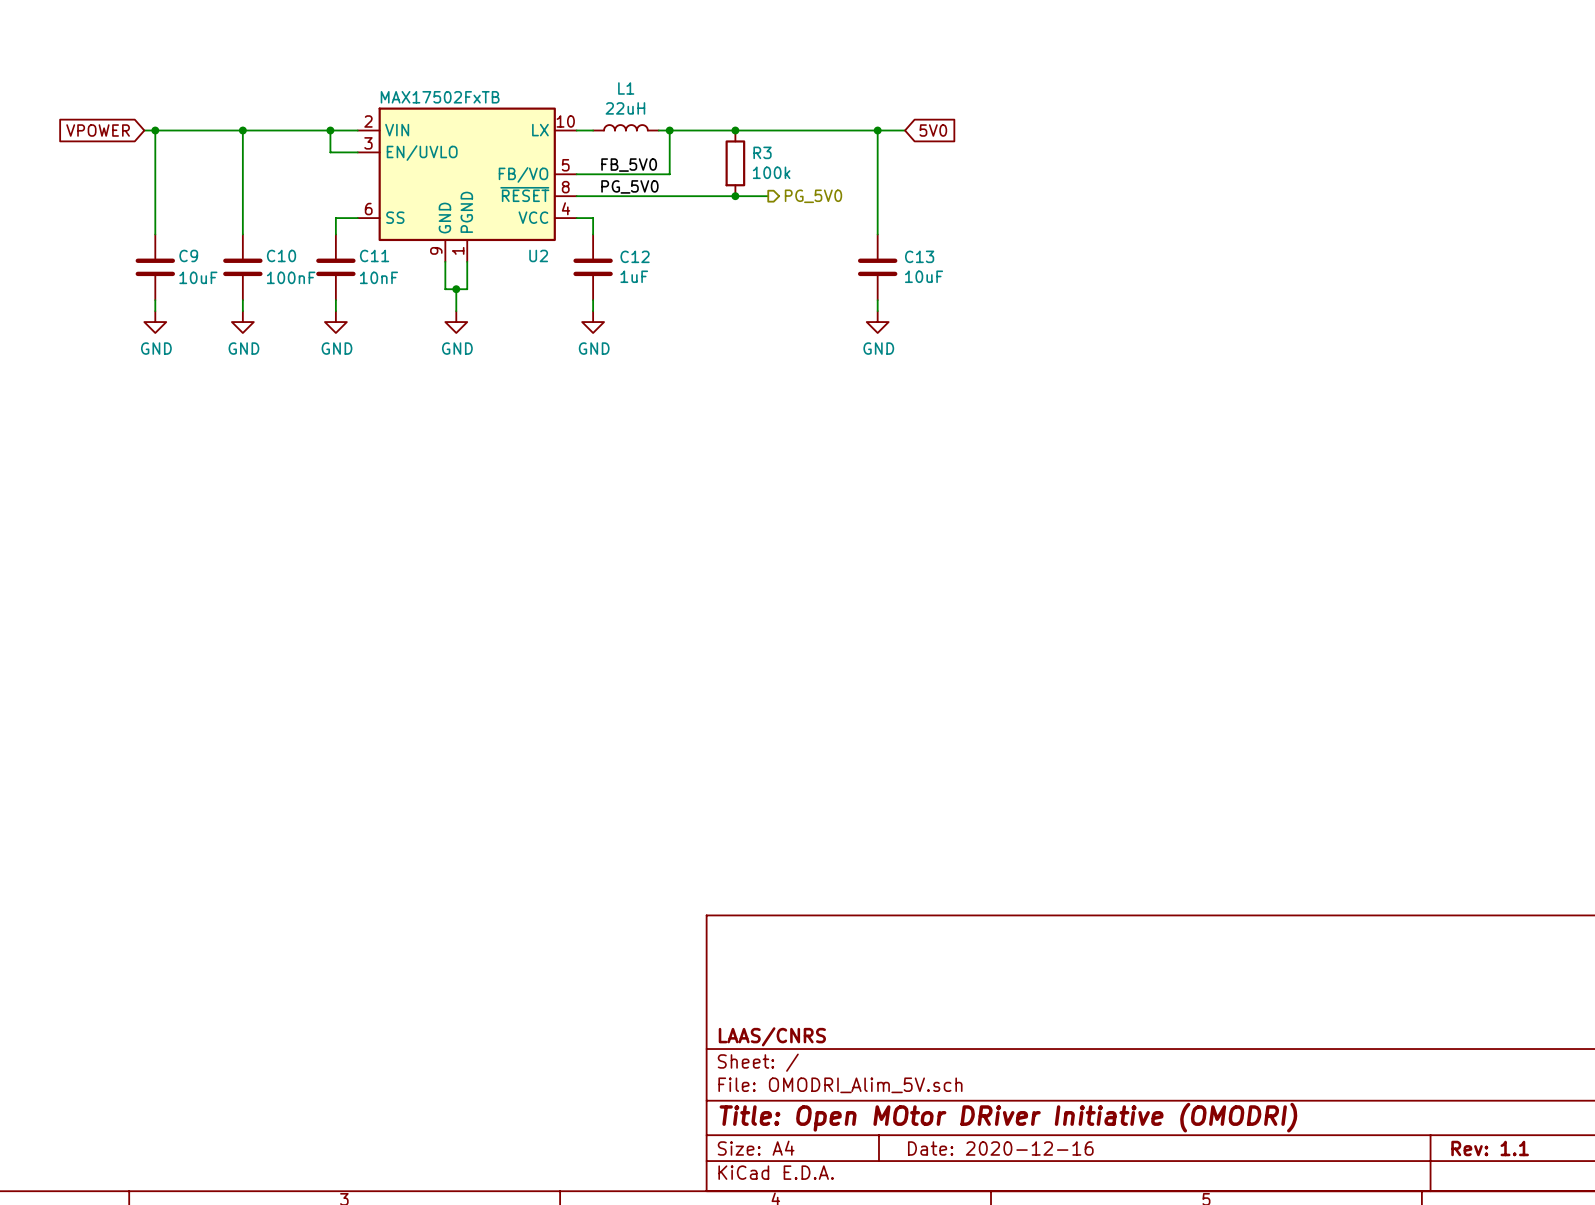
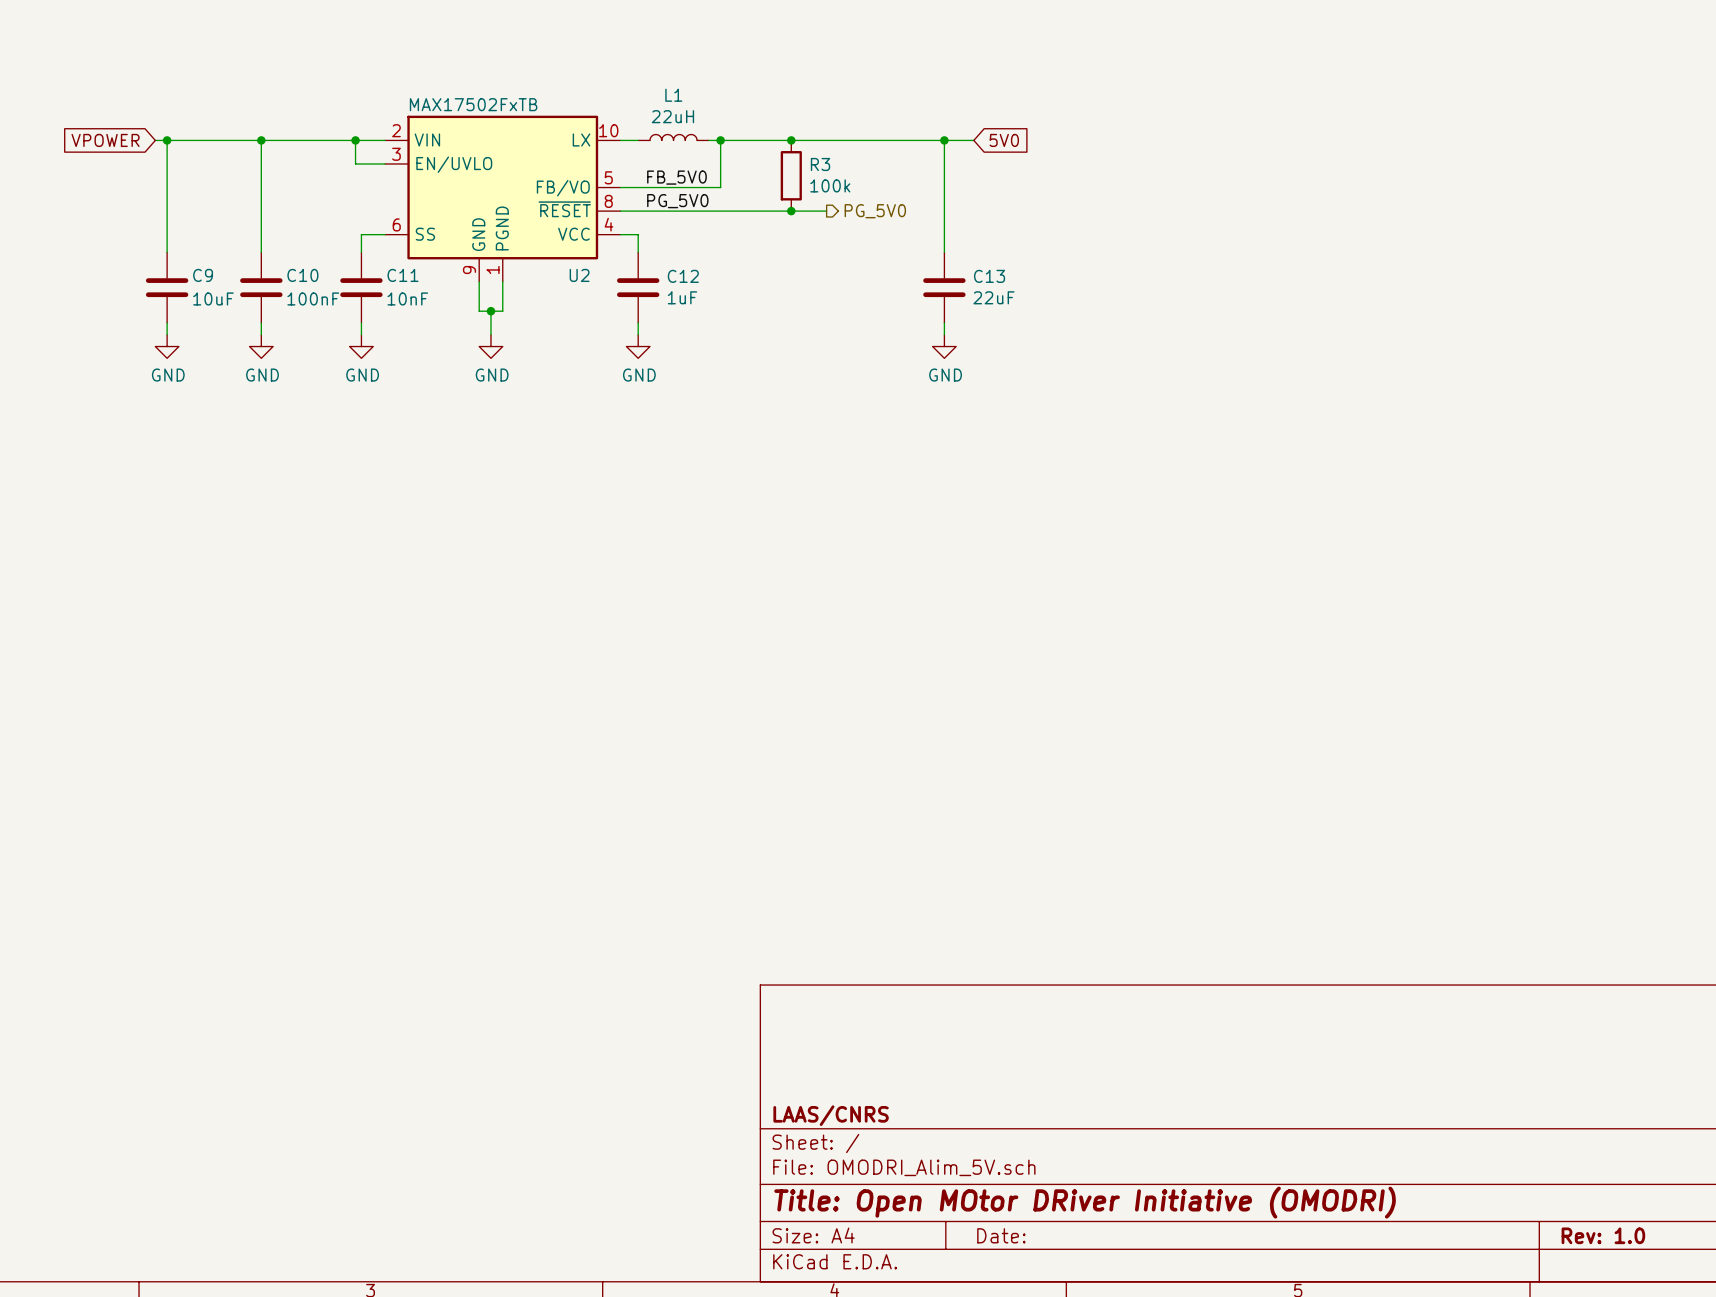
C13 value: 10uF (924, 276) -> 22uF (994, 297)
title block: Date: 2020-12-16 (1000, 1148) -> Date: (1001, 1235)
title block: Rev: 1.1 (1490, 1148) -> Rev: 1.0 (1603, 1235)

